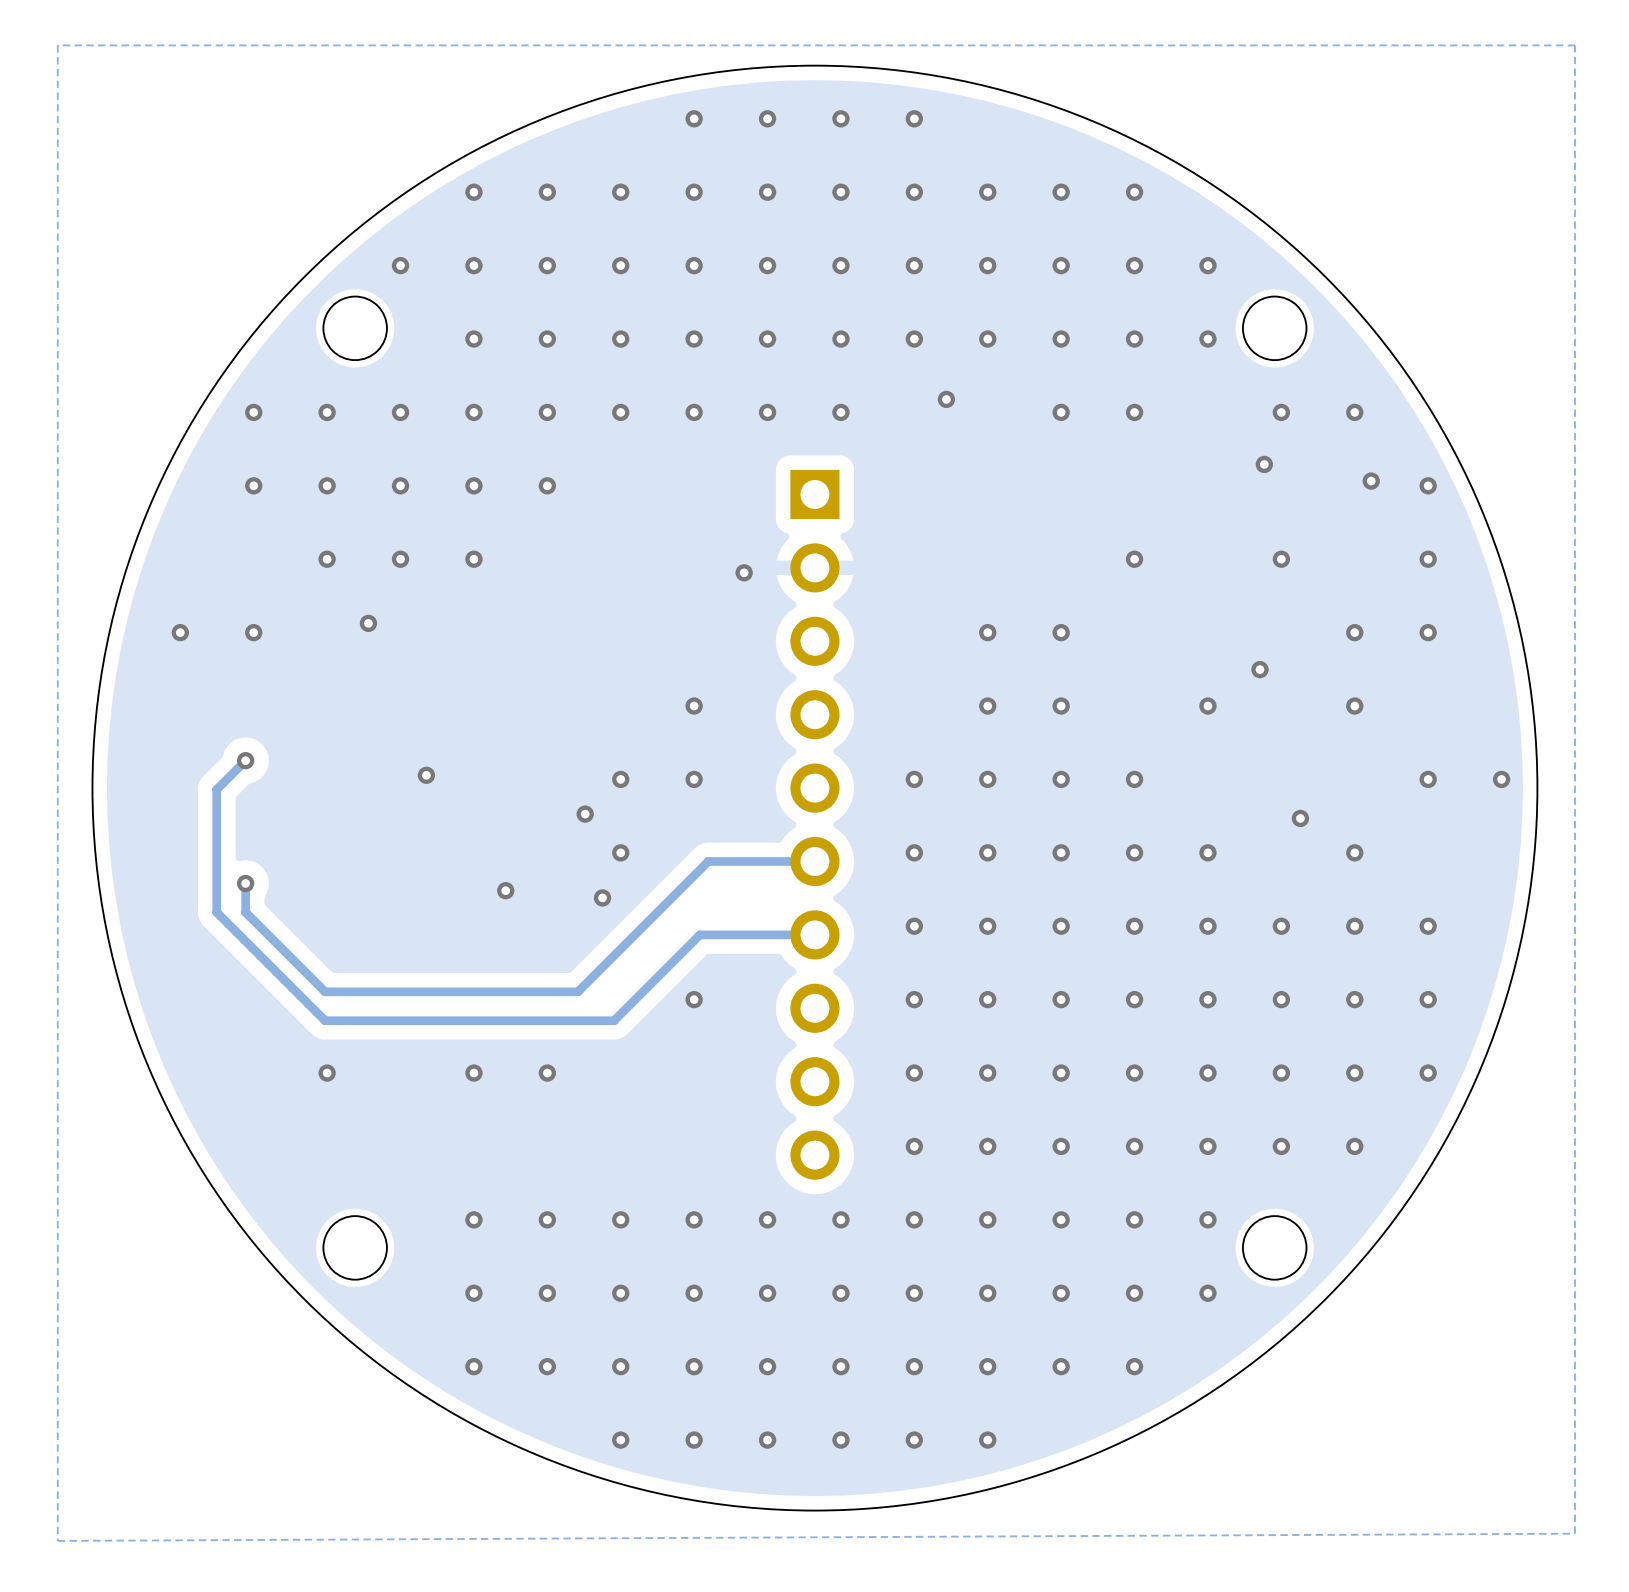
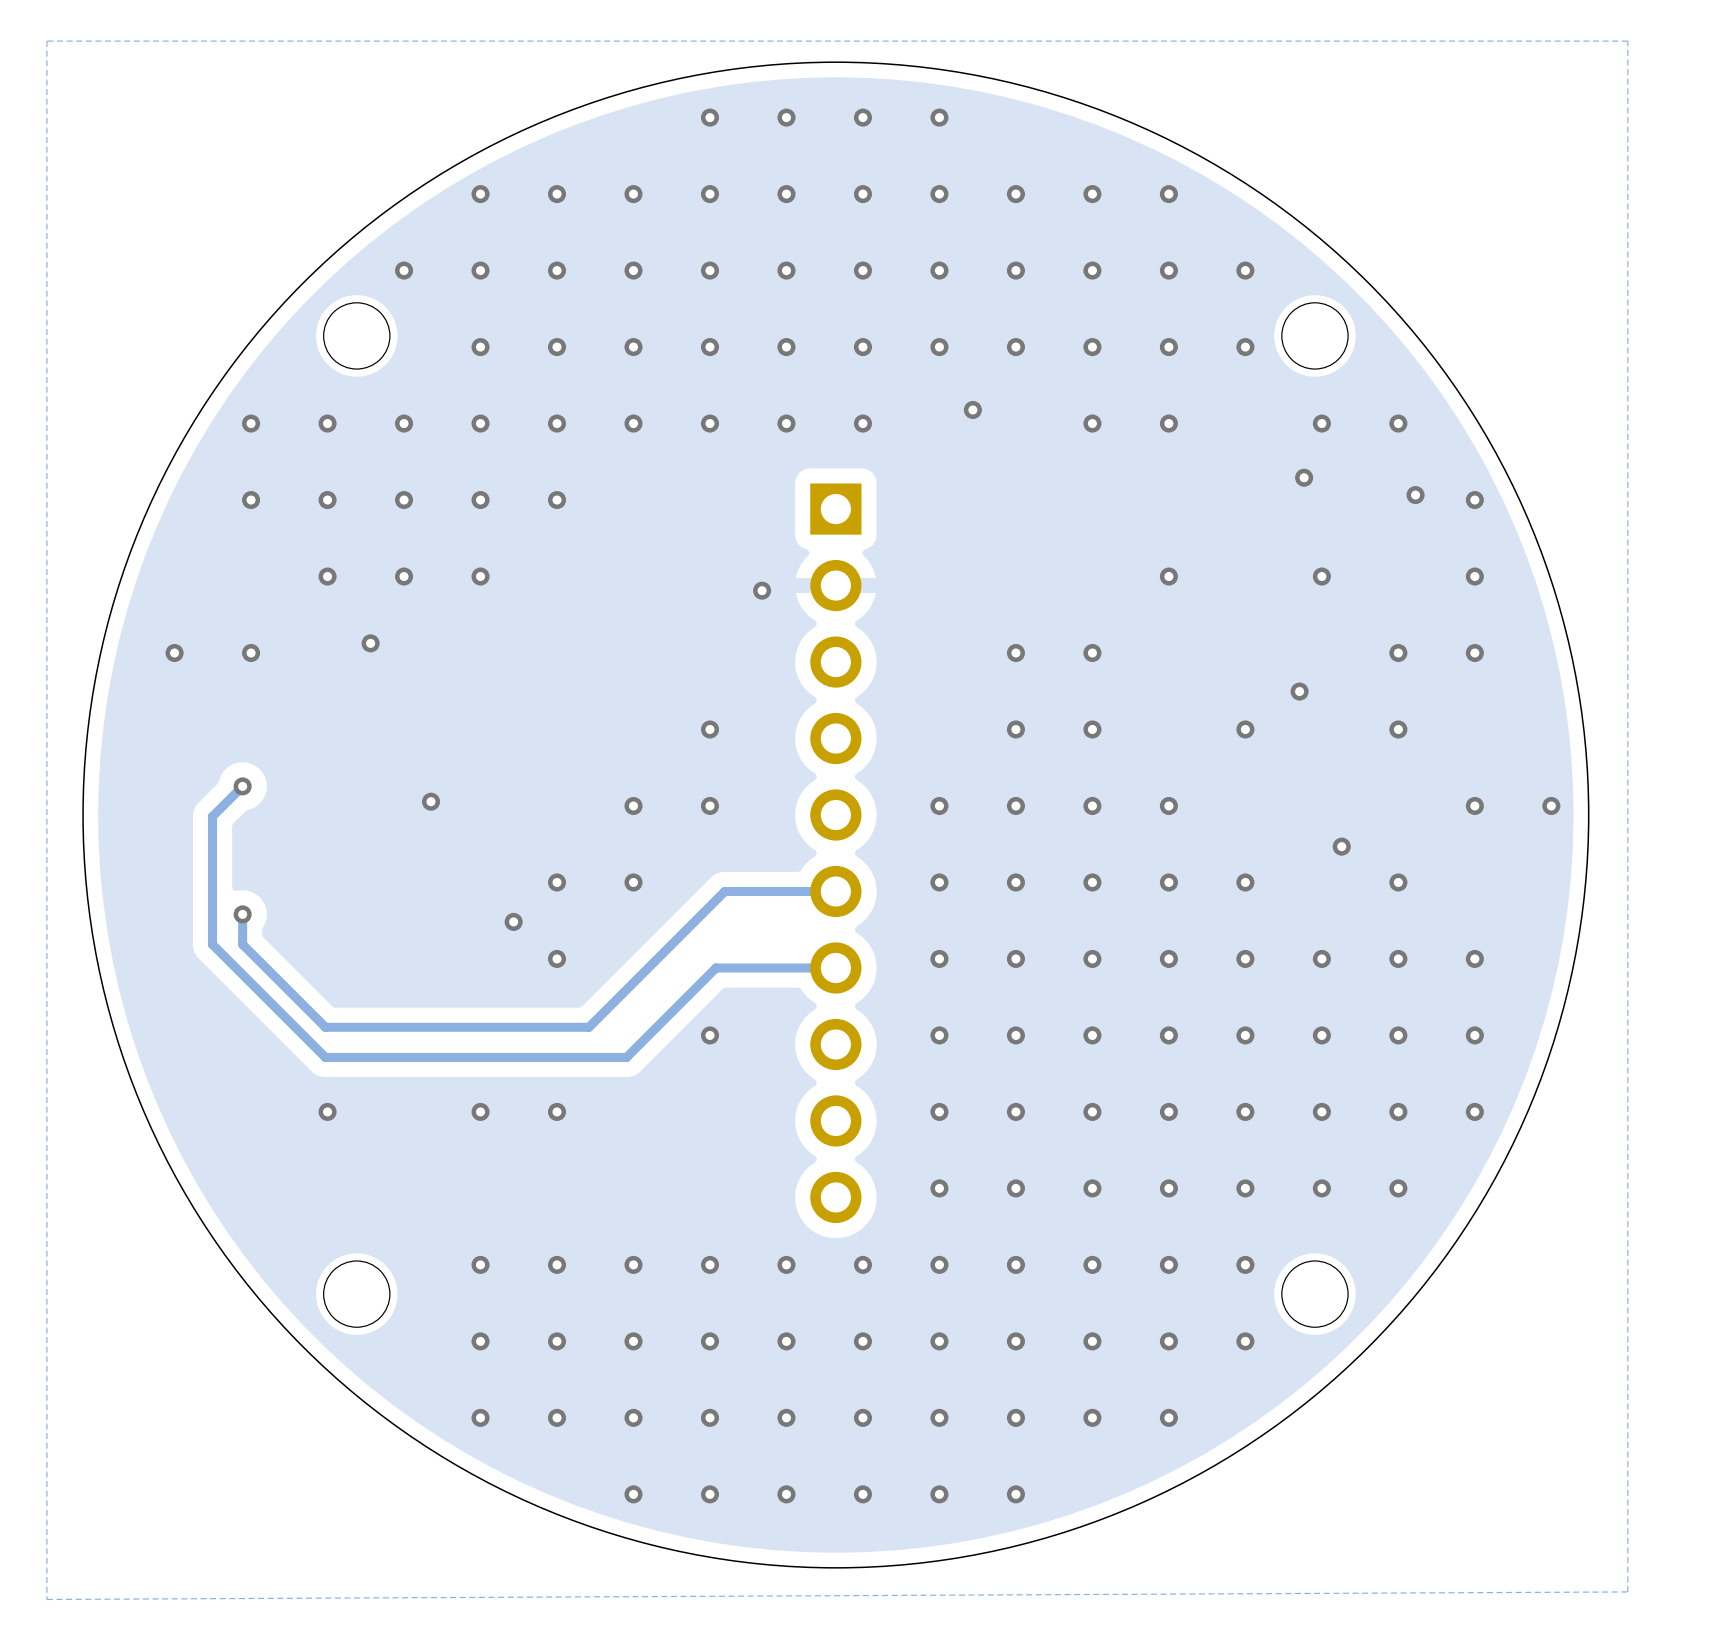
via: (585, 814) -> none
via: none -> (557, 882)
via: (602, 897) -> none
via: none -> (557, 958)

